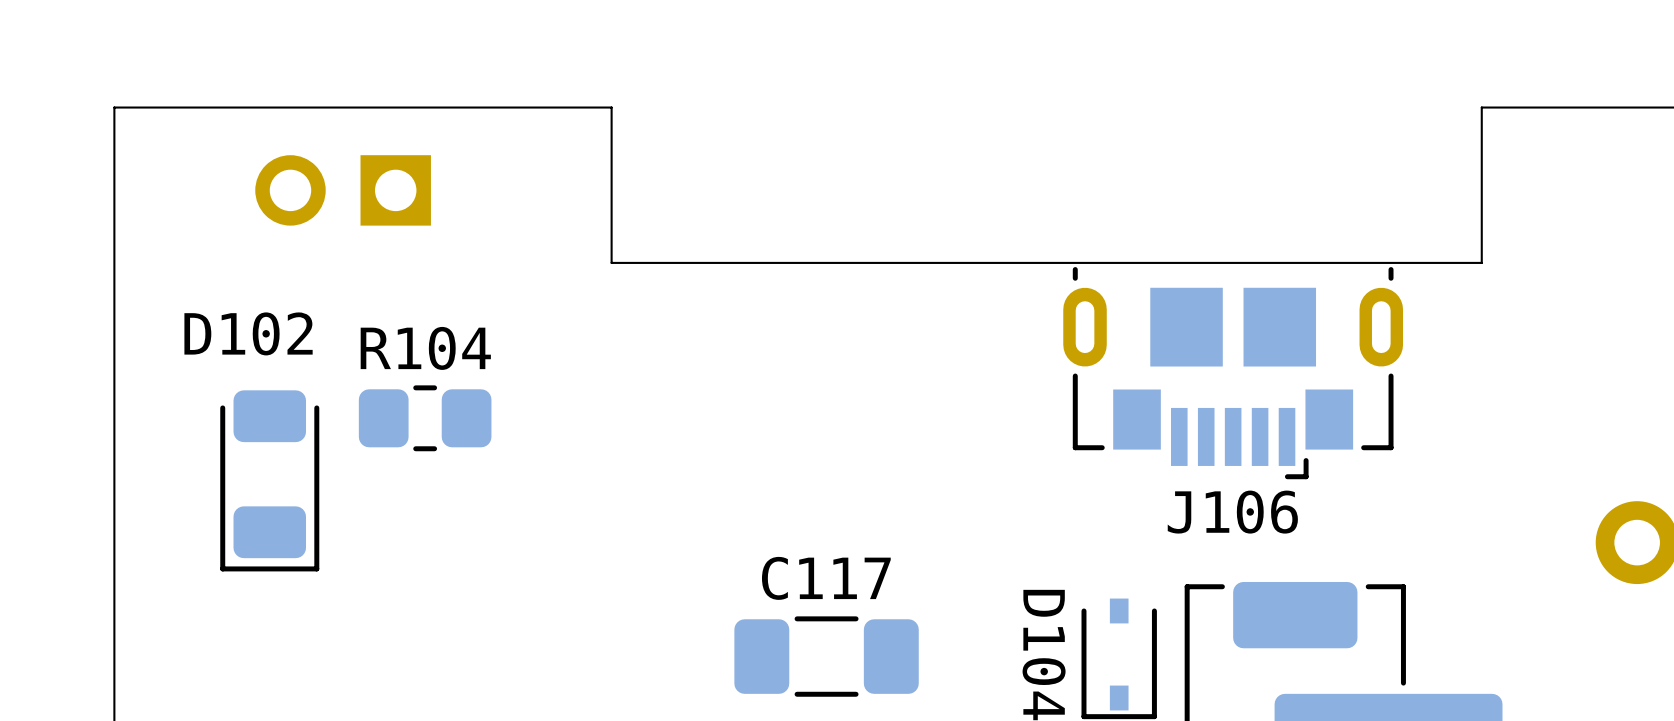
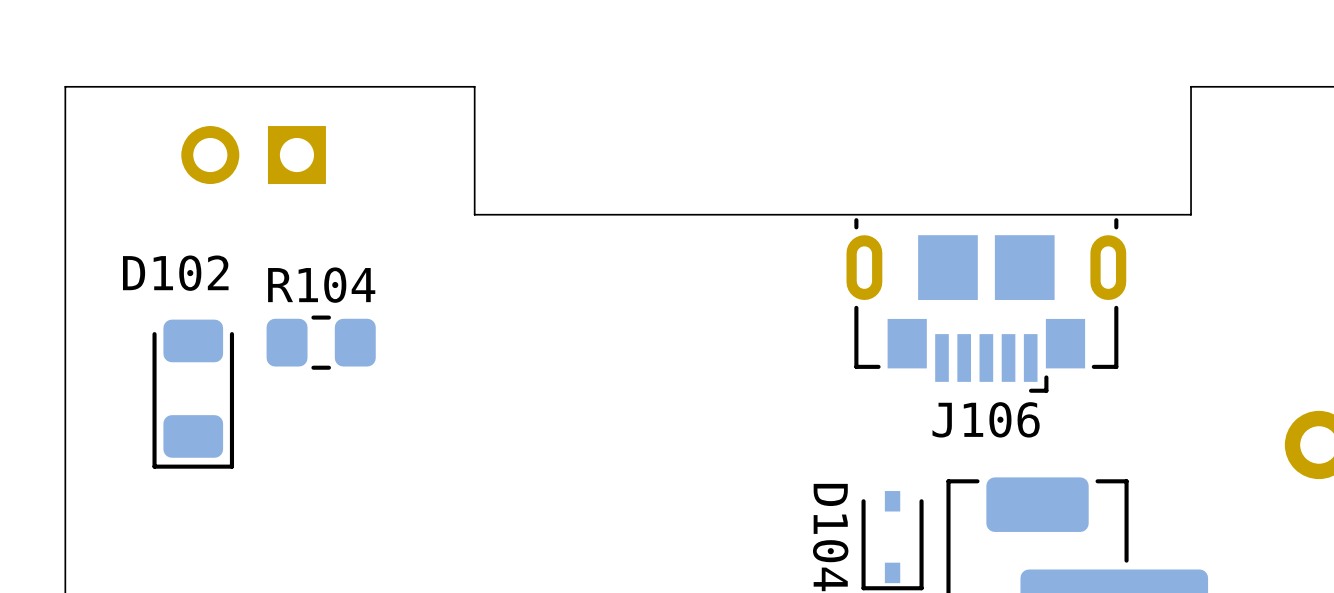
C117: (826, 656) -> none

